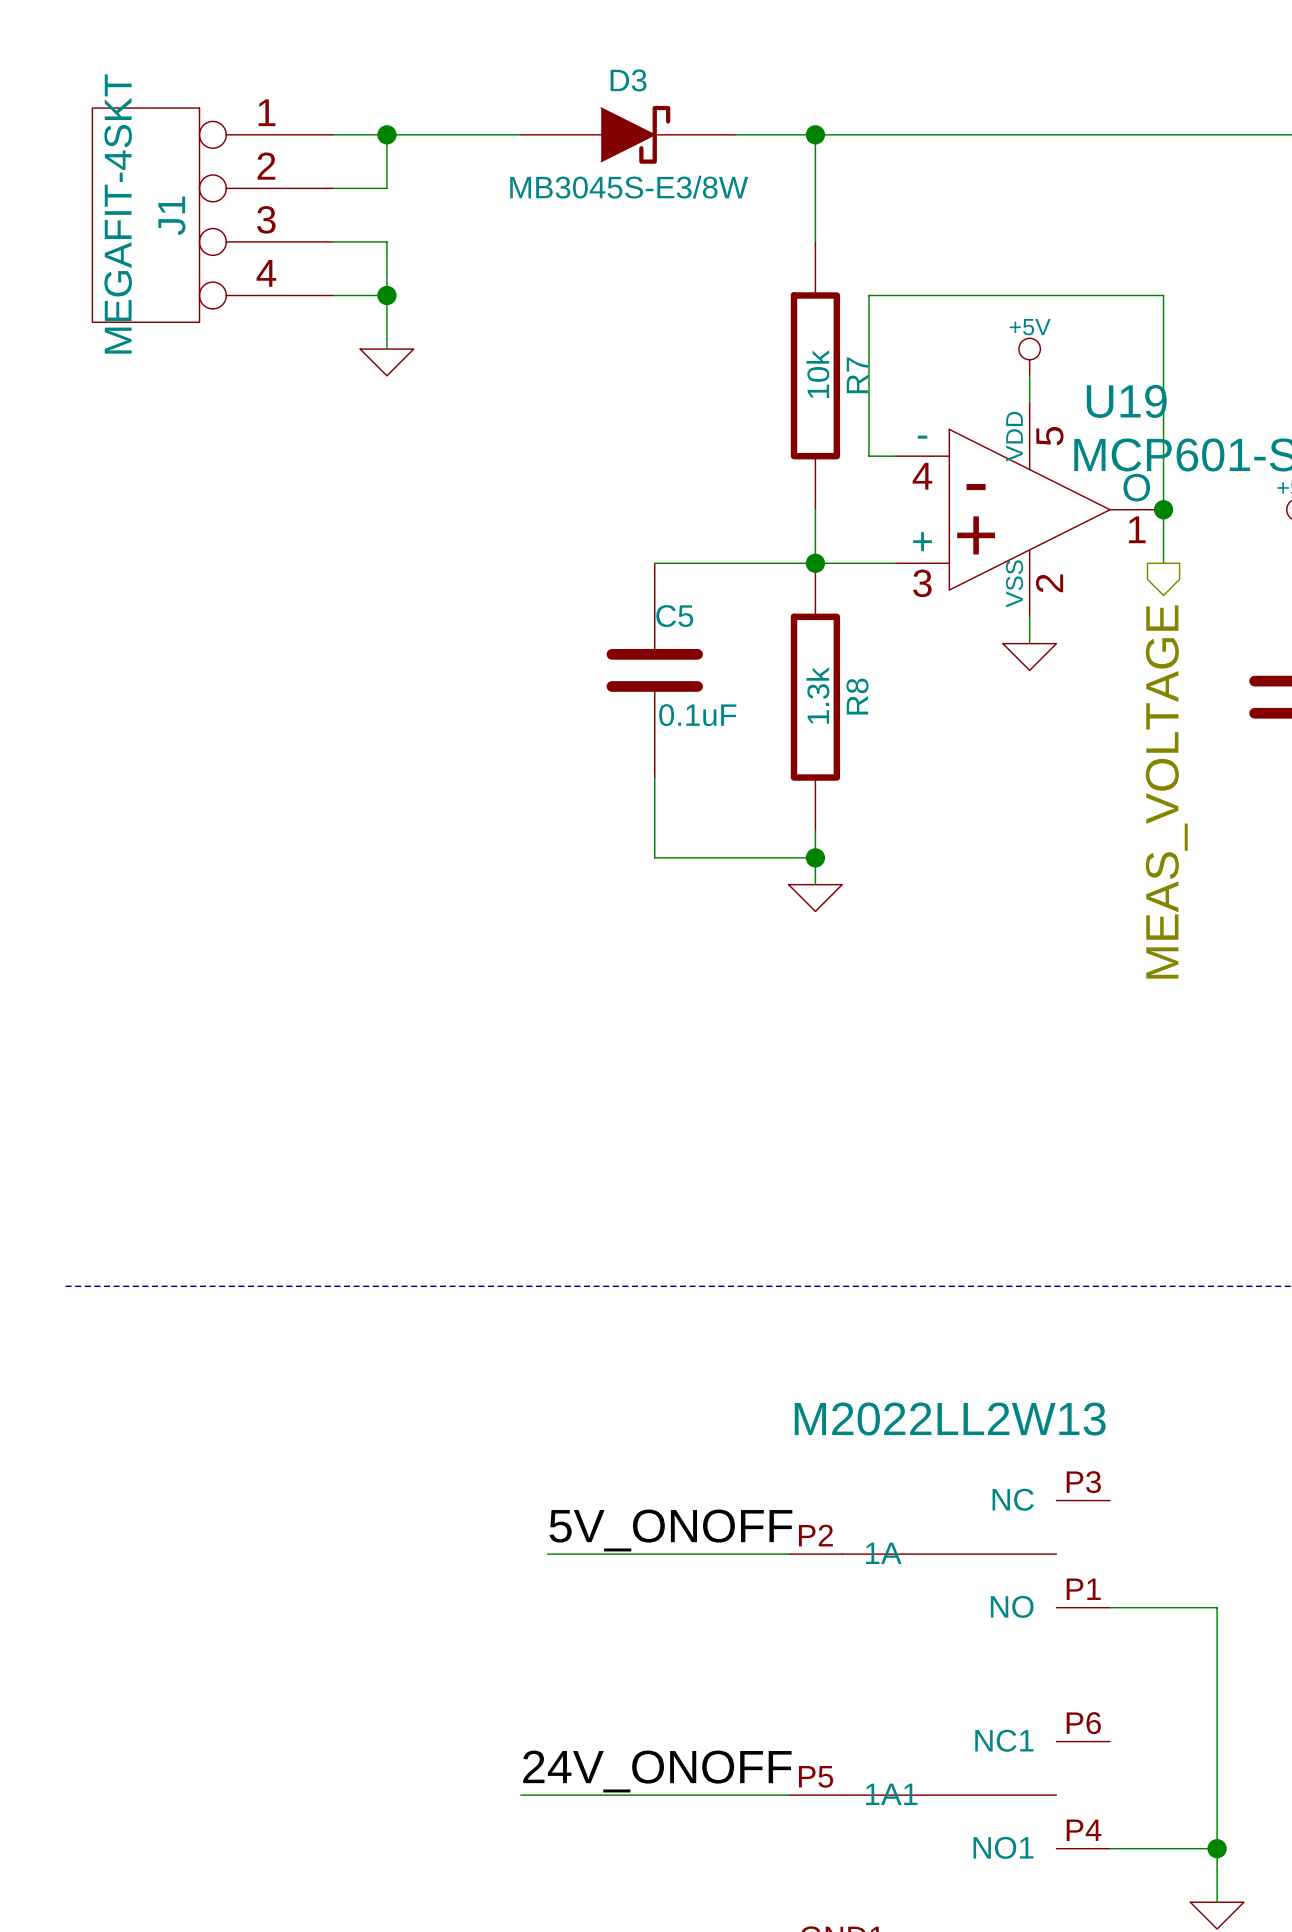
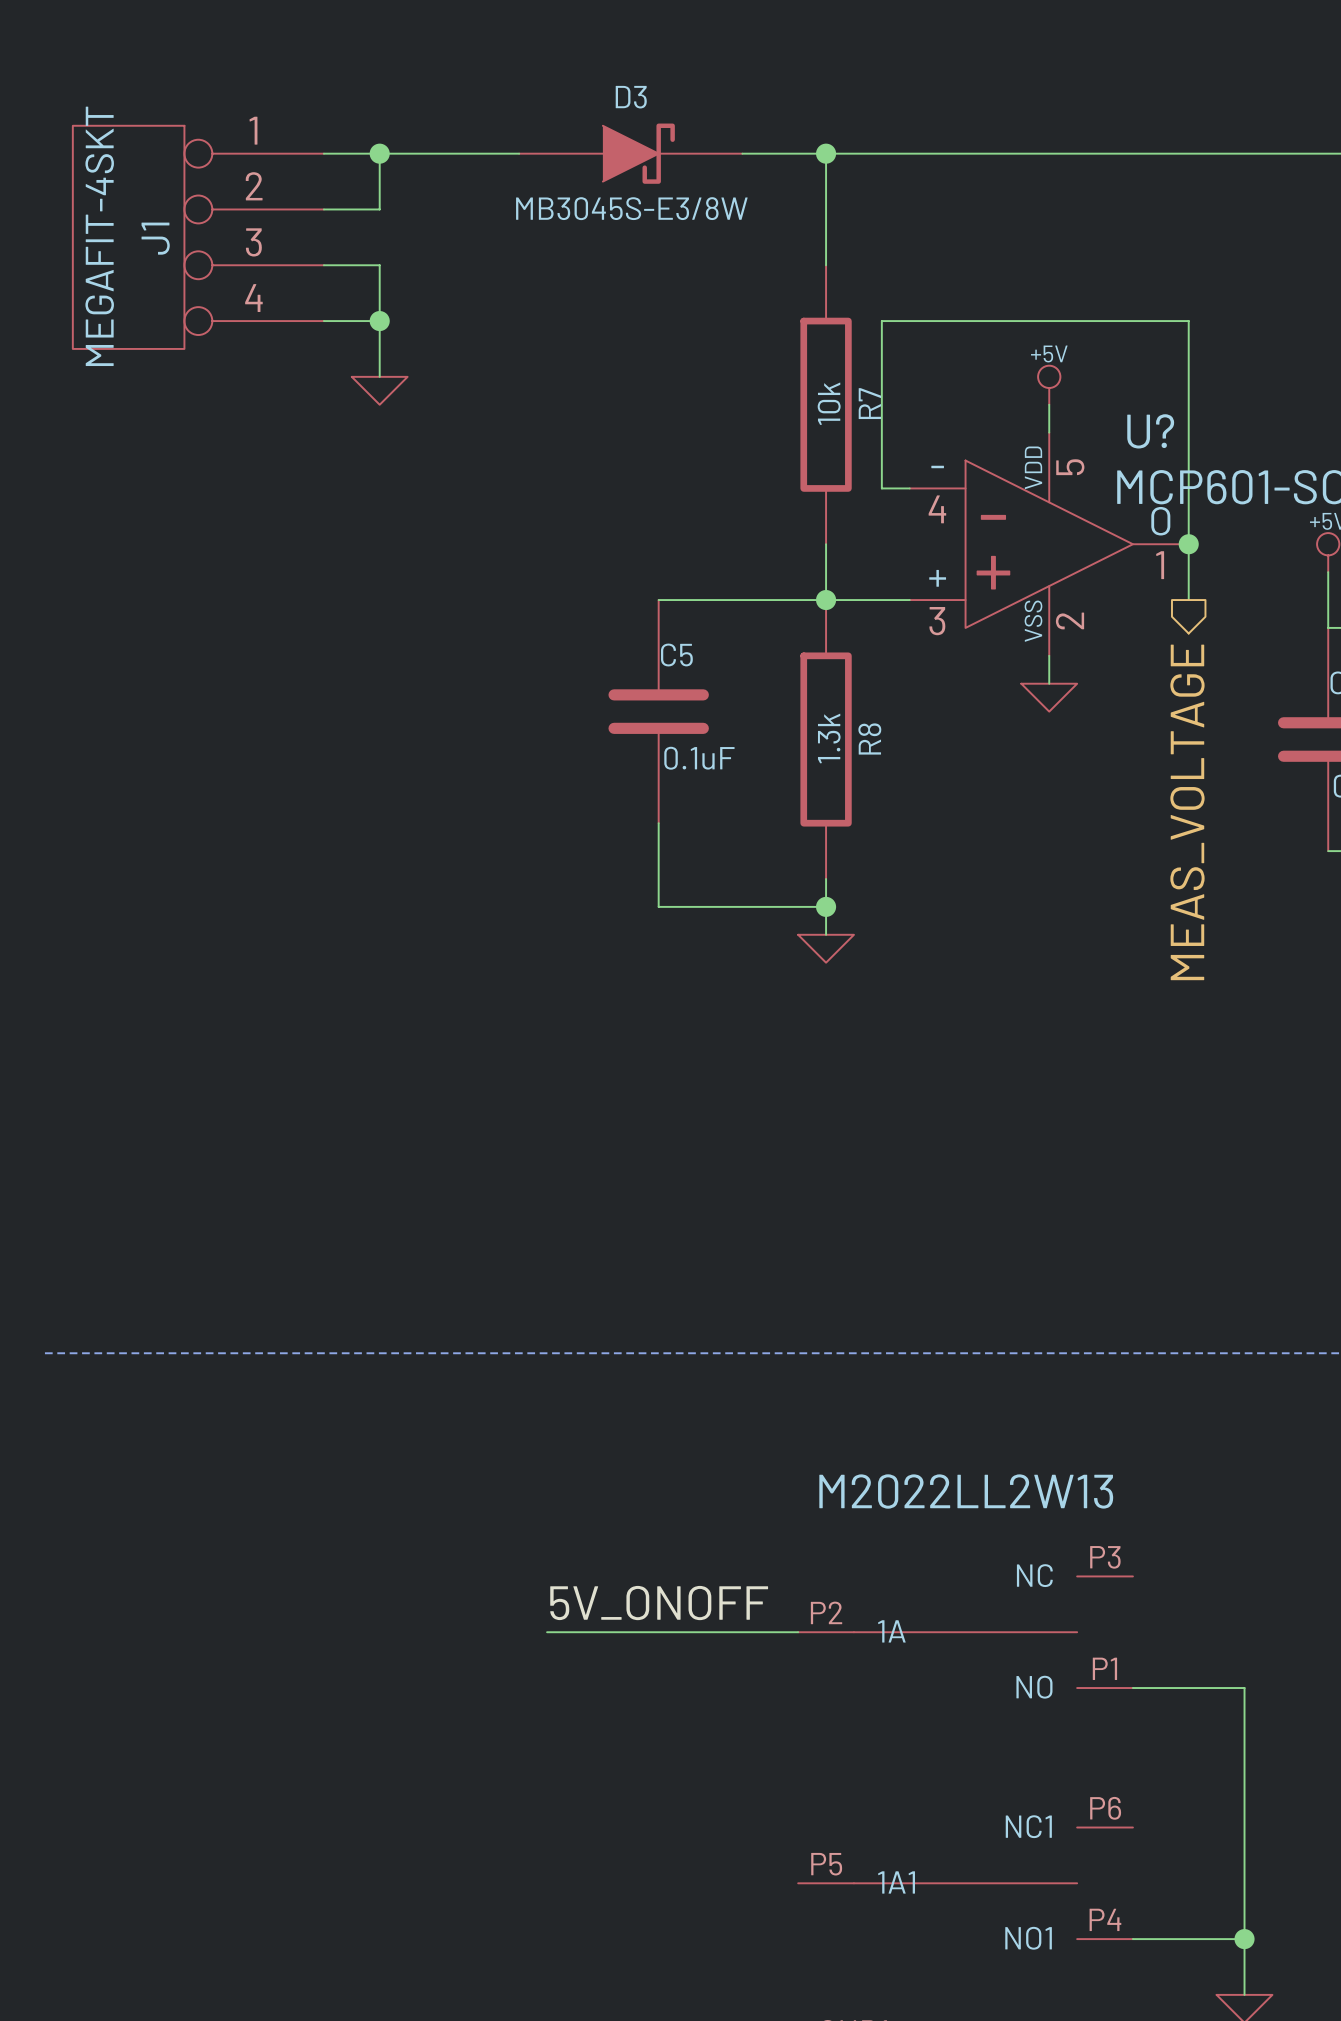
U19 name: U19 (1126, 401) -> U? (1150, 431)
label: 24V_ONOFF (657, 1771) -> none
wire: (520, 1795) (788, 1795) -> none

